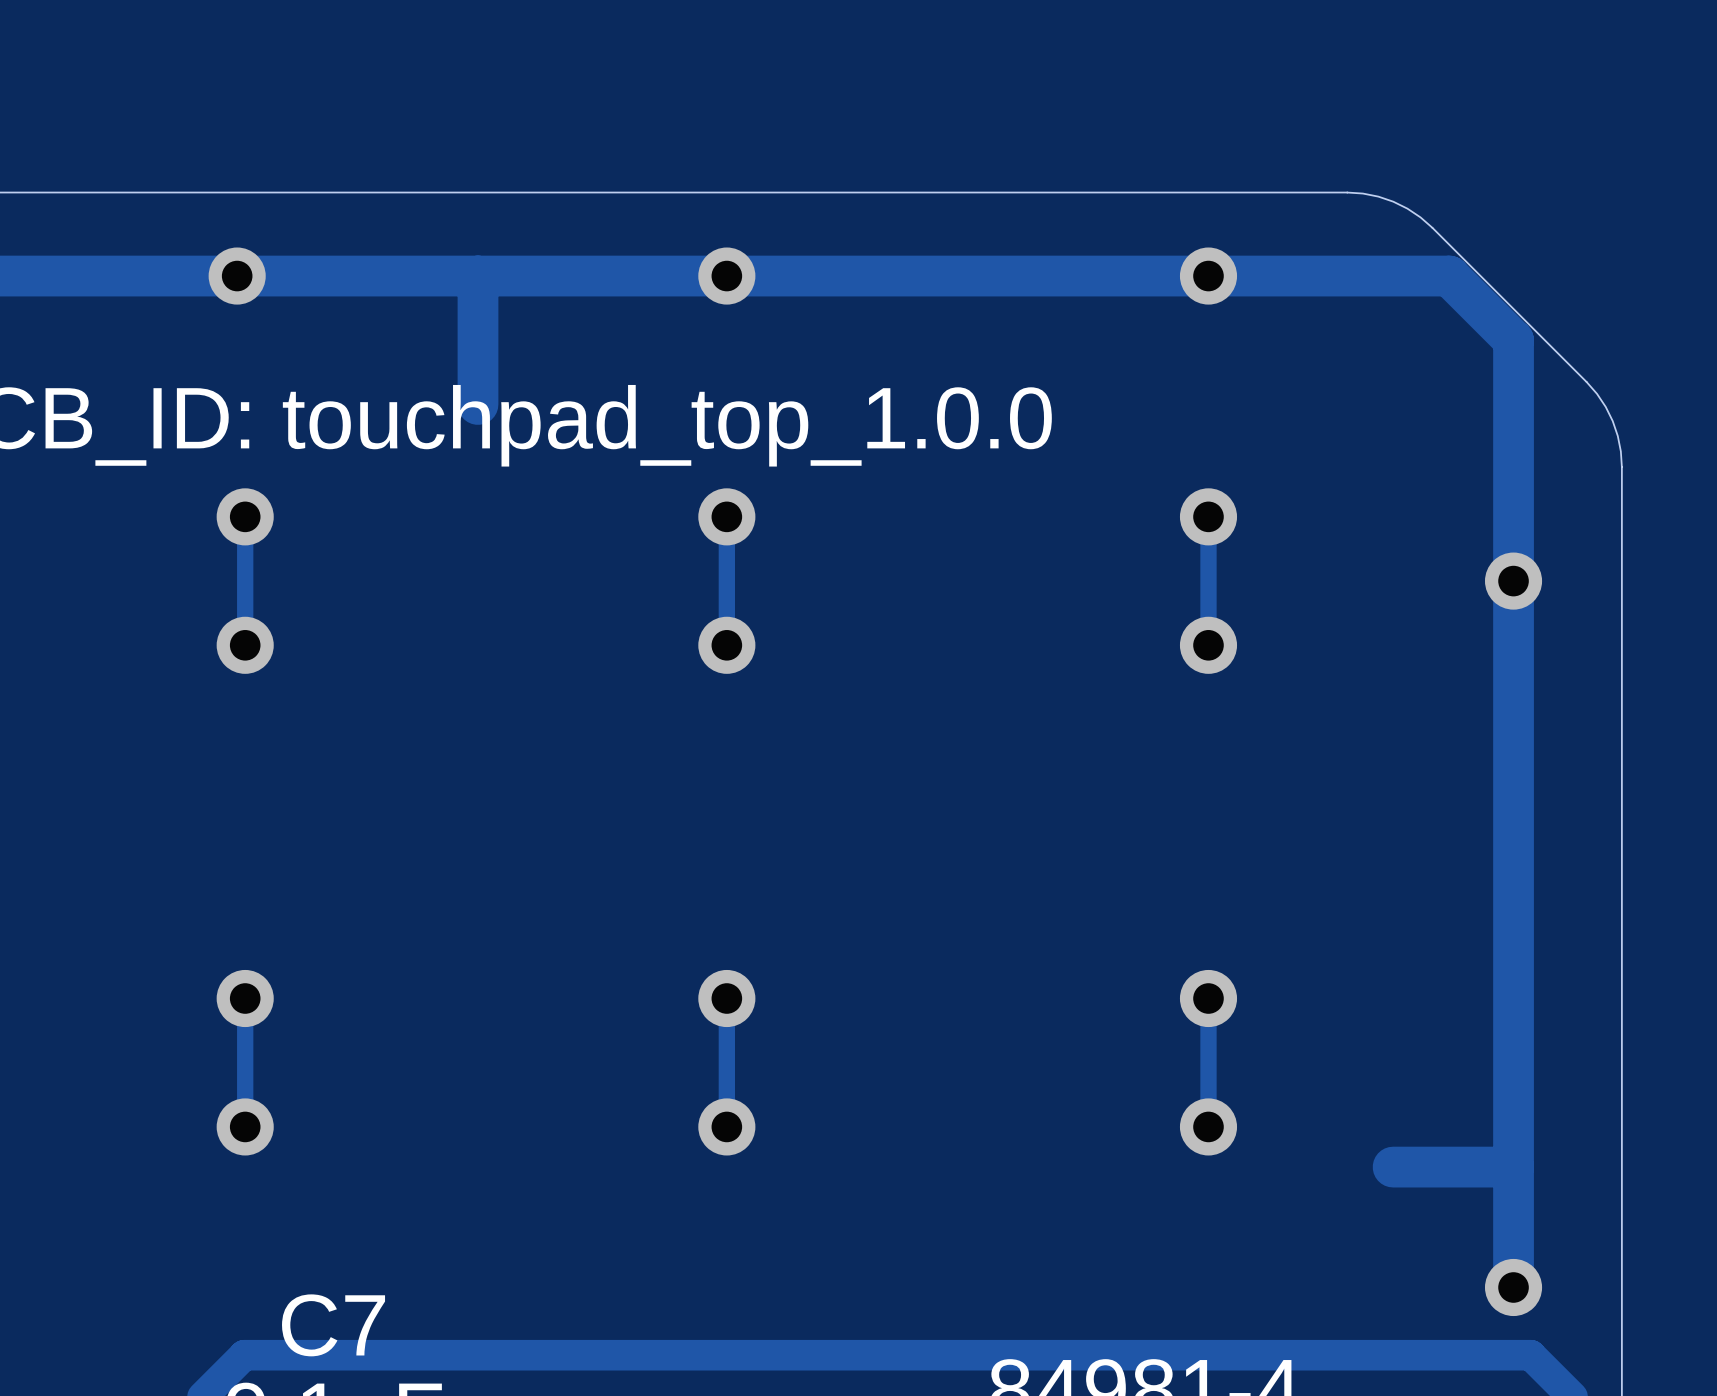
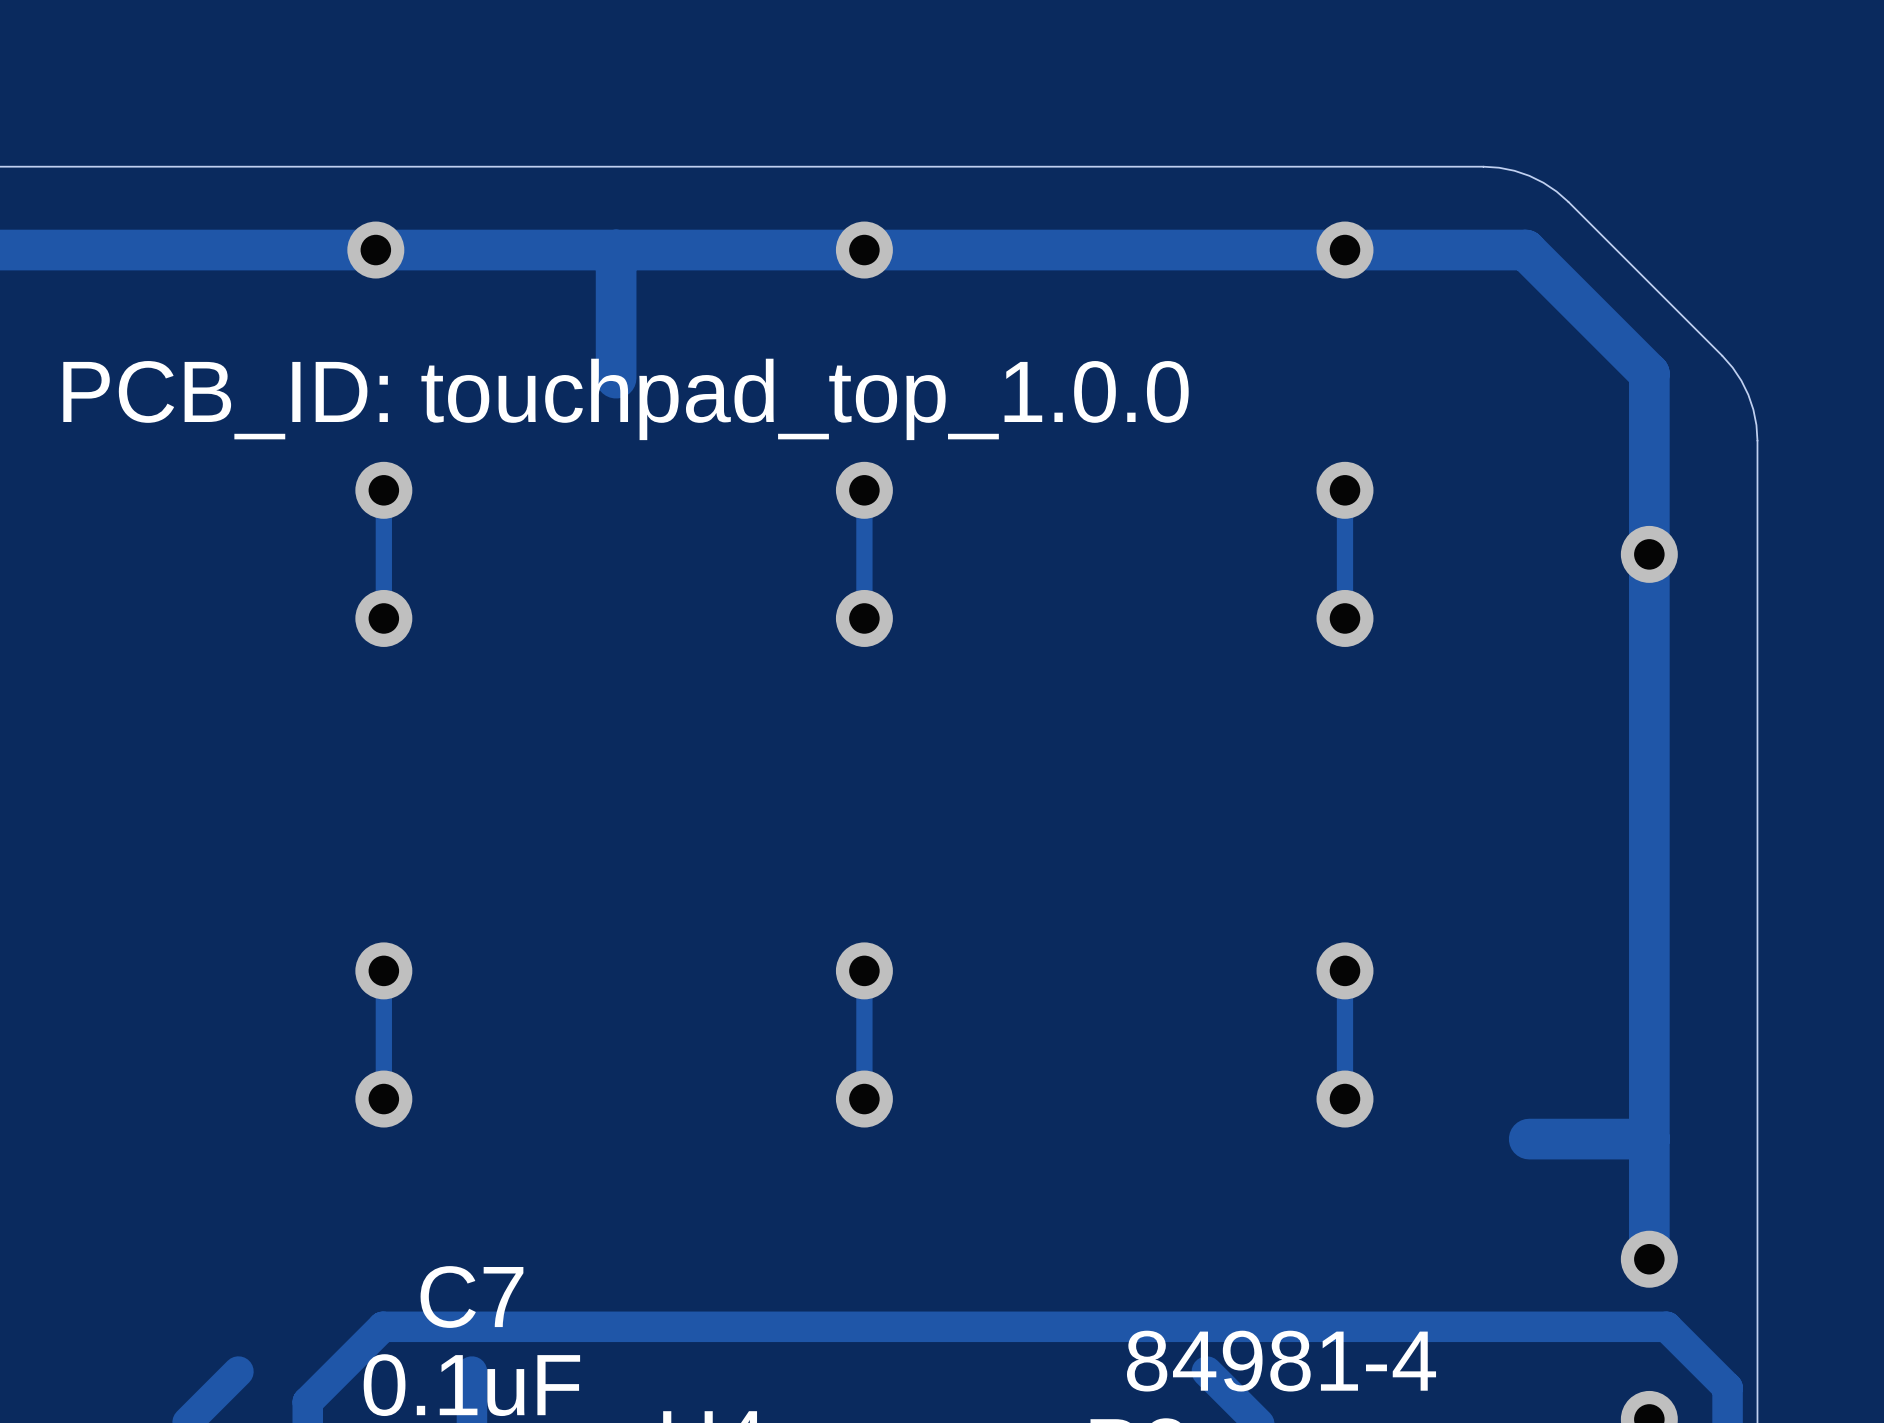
track: (1389, 276) (1449, 276) (1513, 340) (1513, 399) -> (1525, 250) (1649, 373)

